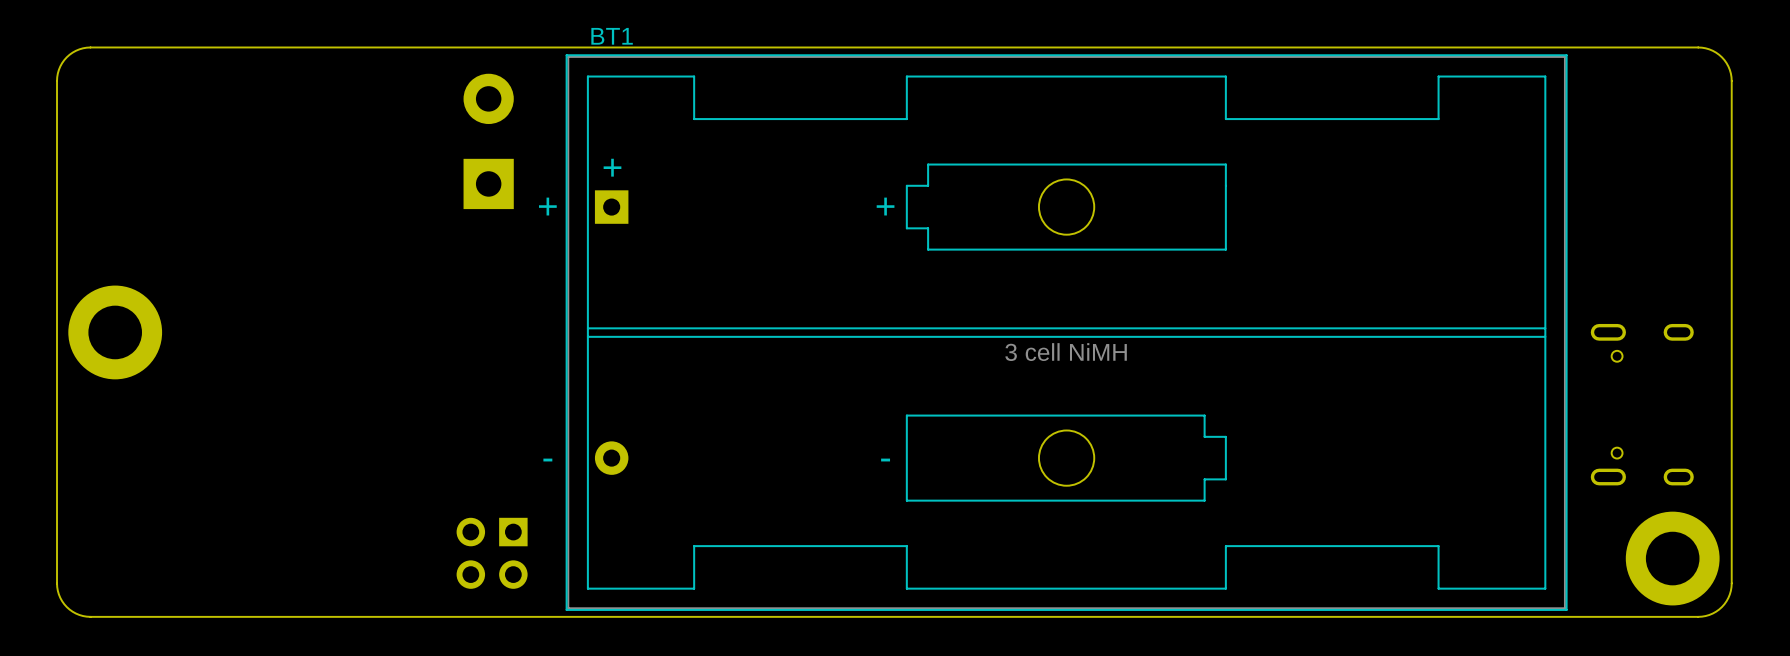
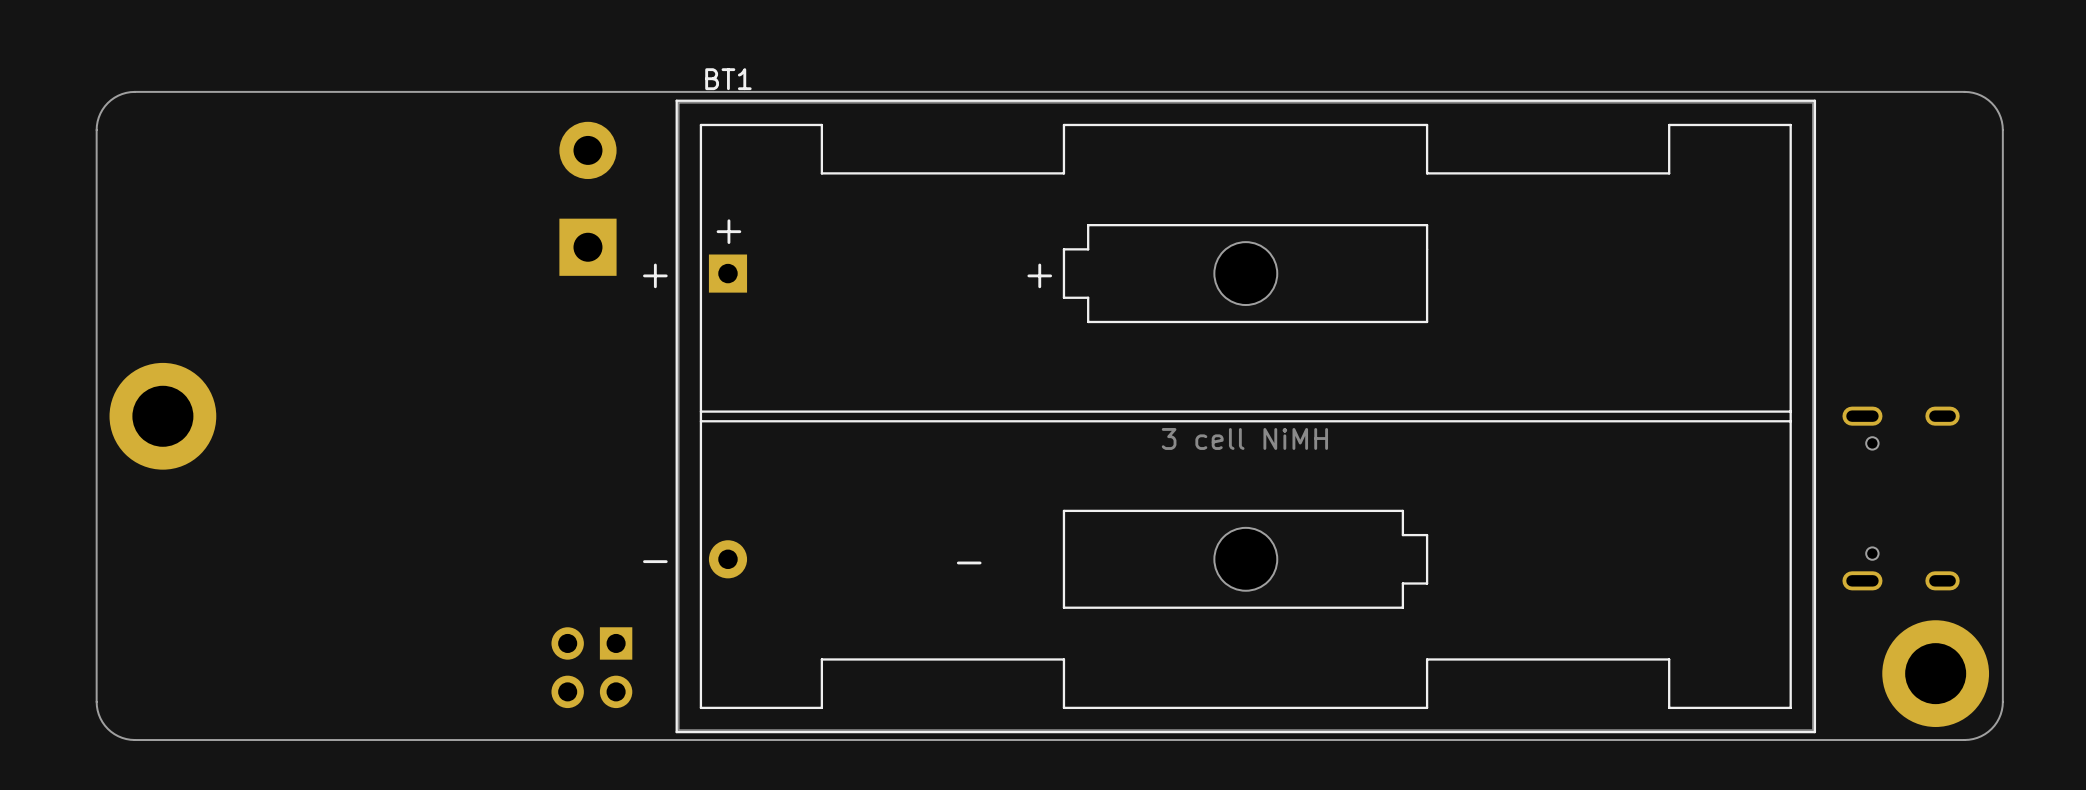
BT1 text position: - (885, 460) -> - (969, 562)

